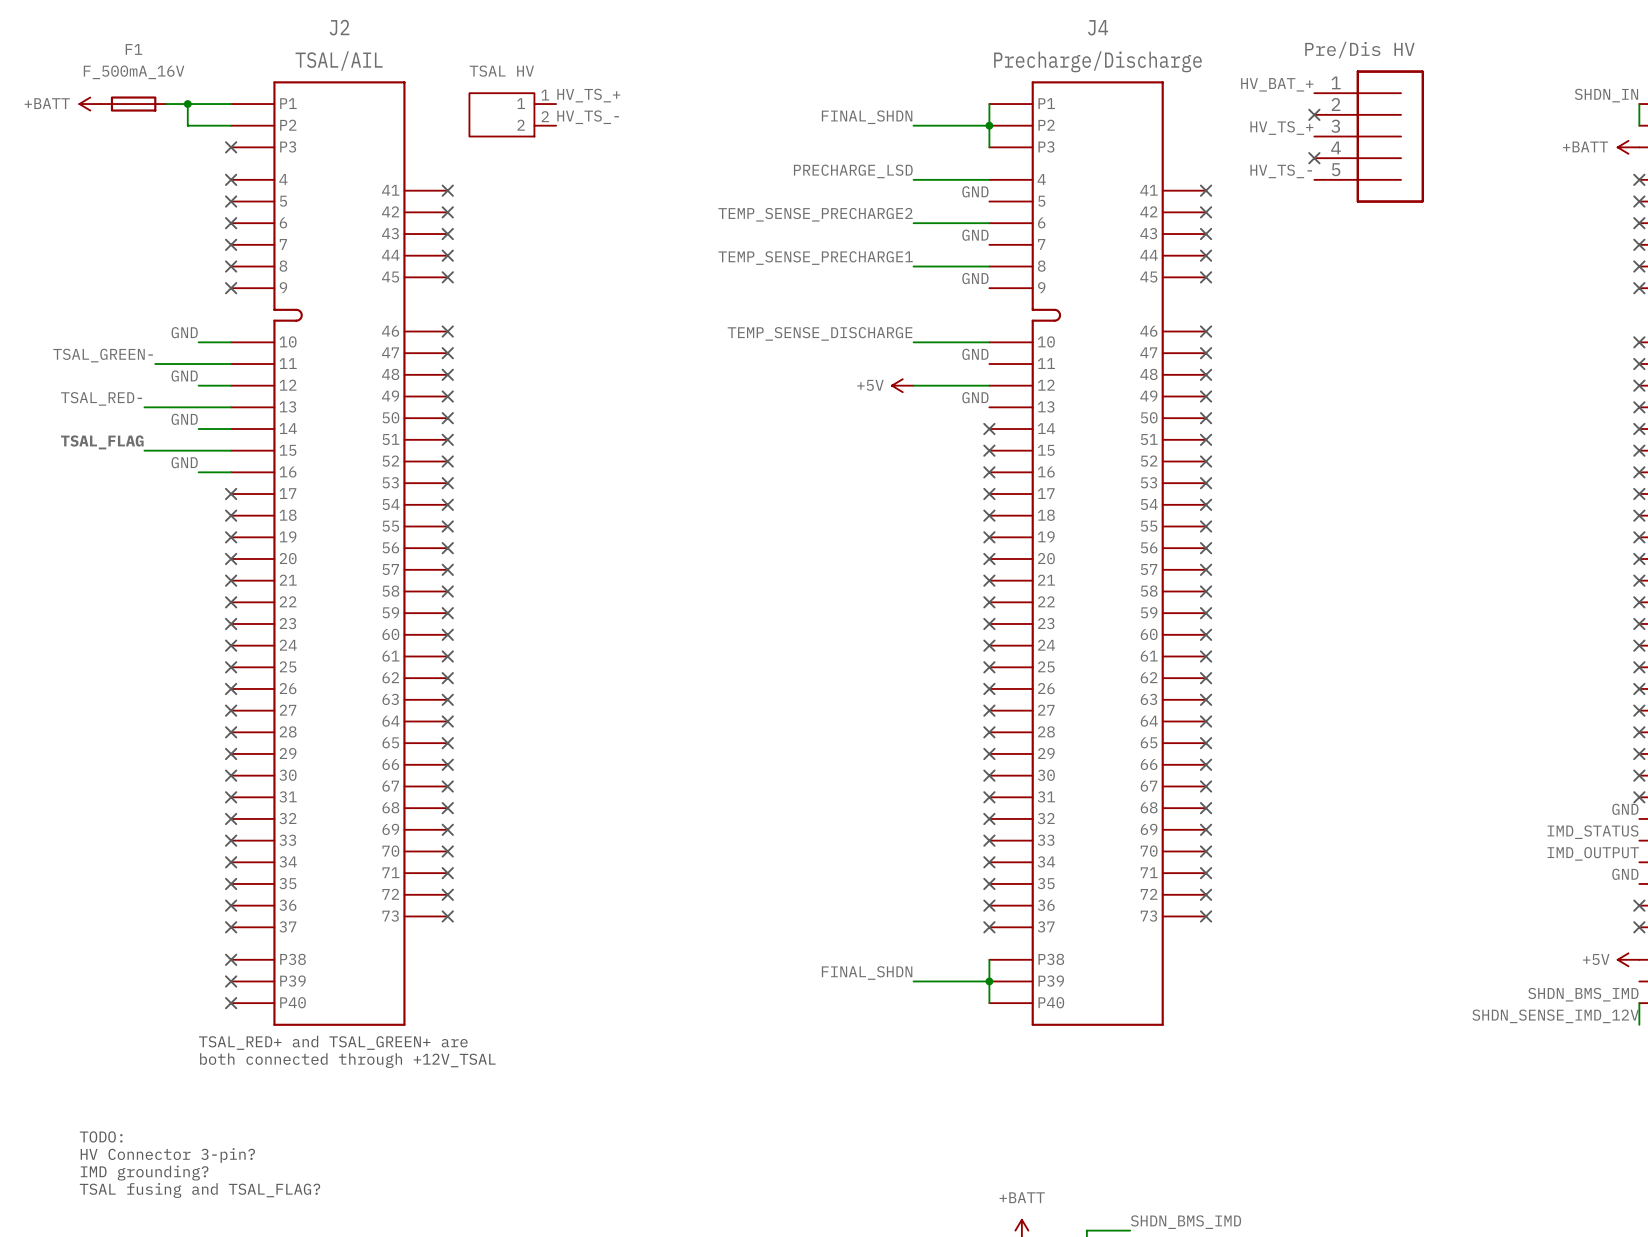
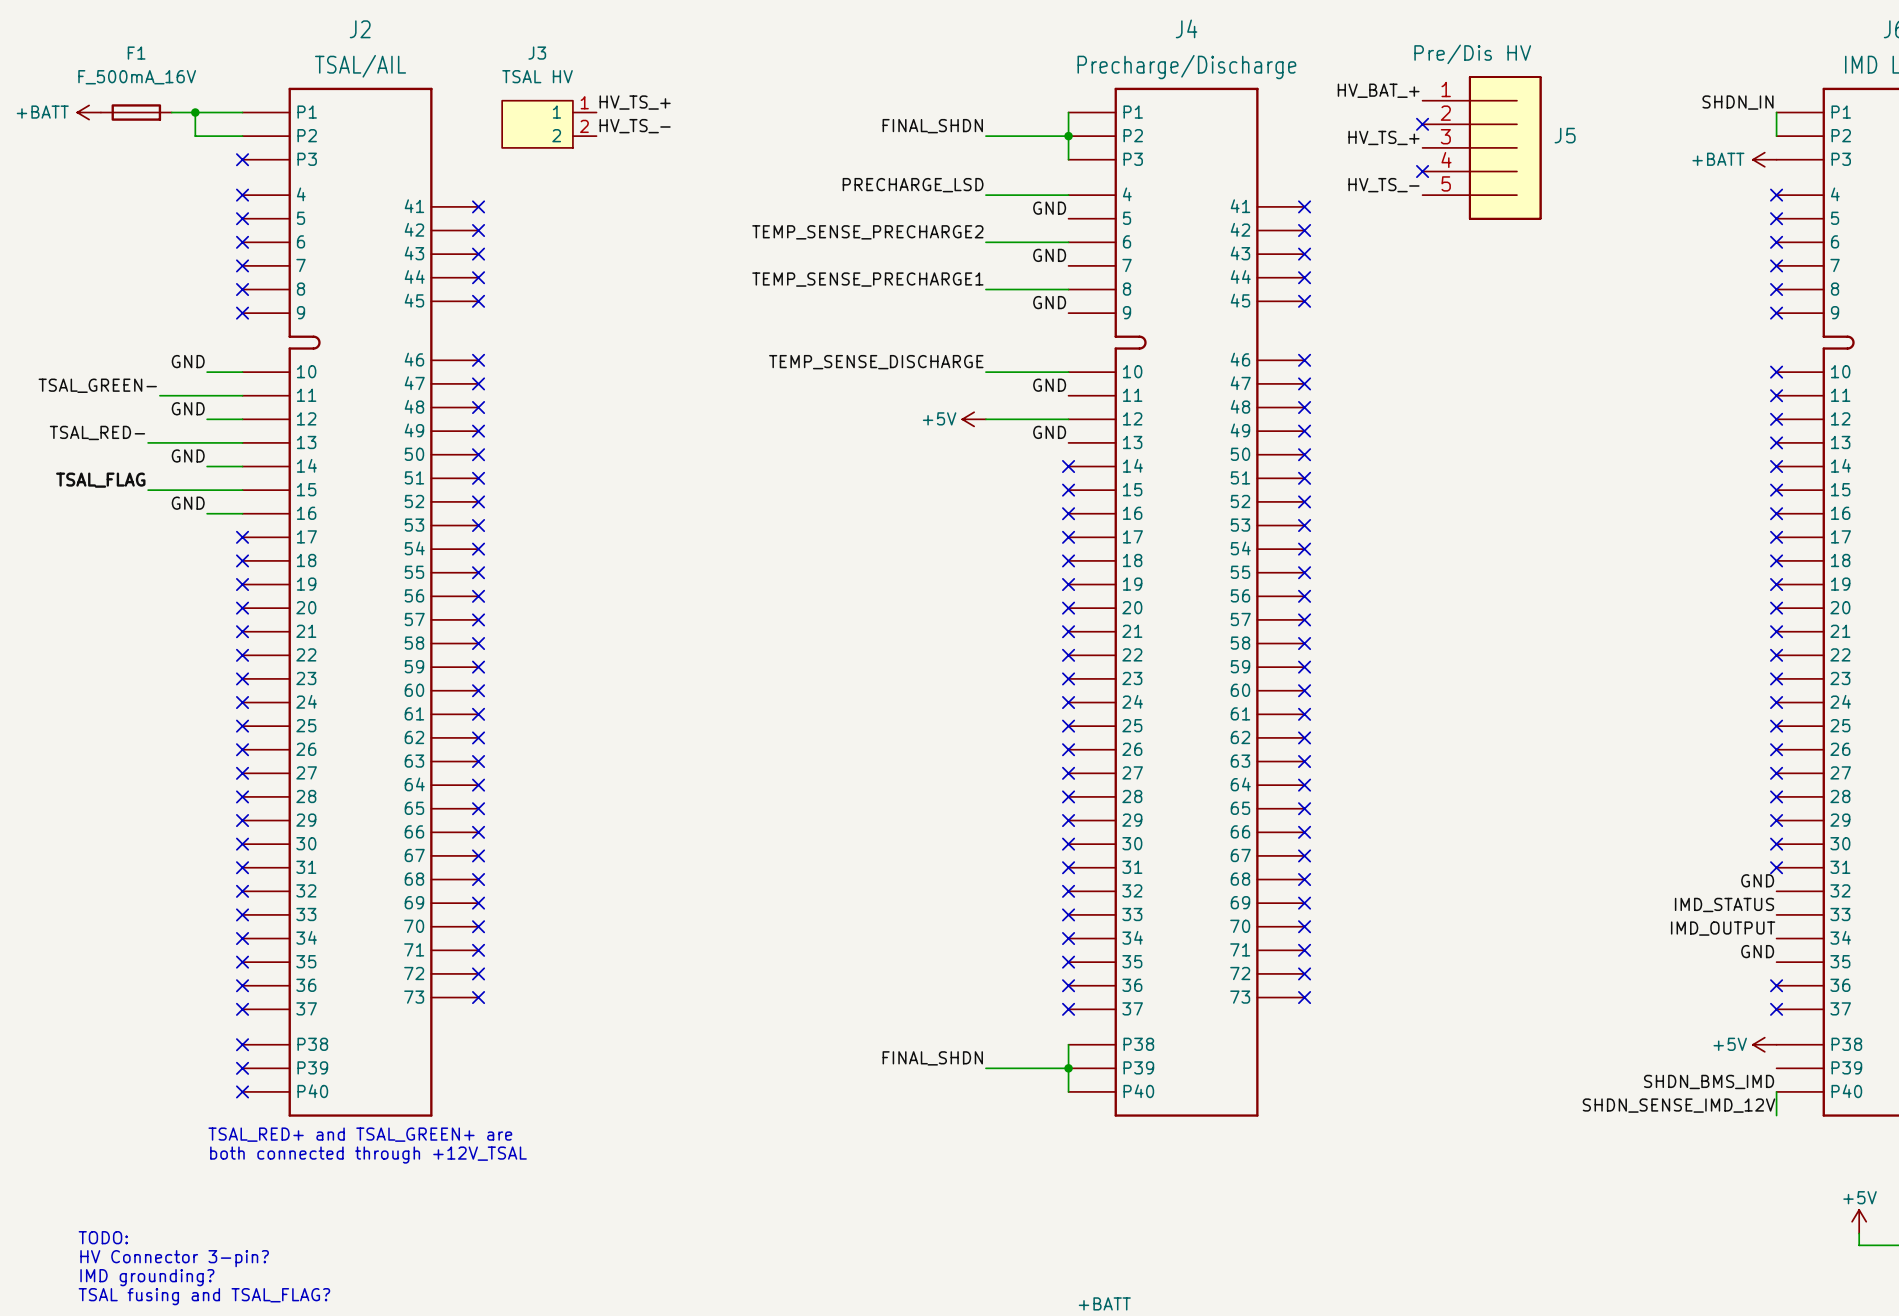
J3 name: none -> J3 (537, 53)
J5 name: none -> J5 (1565, 135)

